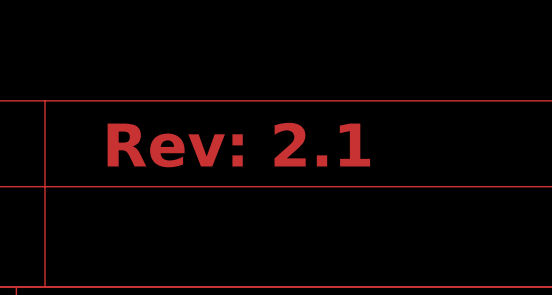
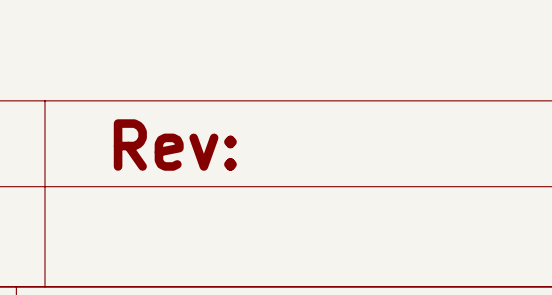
title block: Rev: 2.1 (238, 145) -> Rev: (175, 145)

